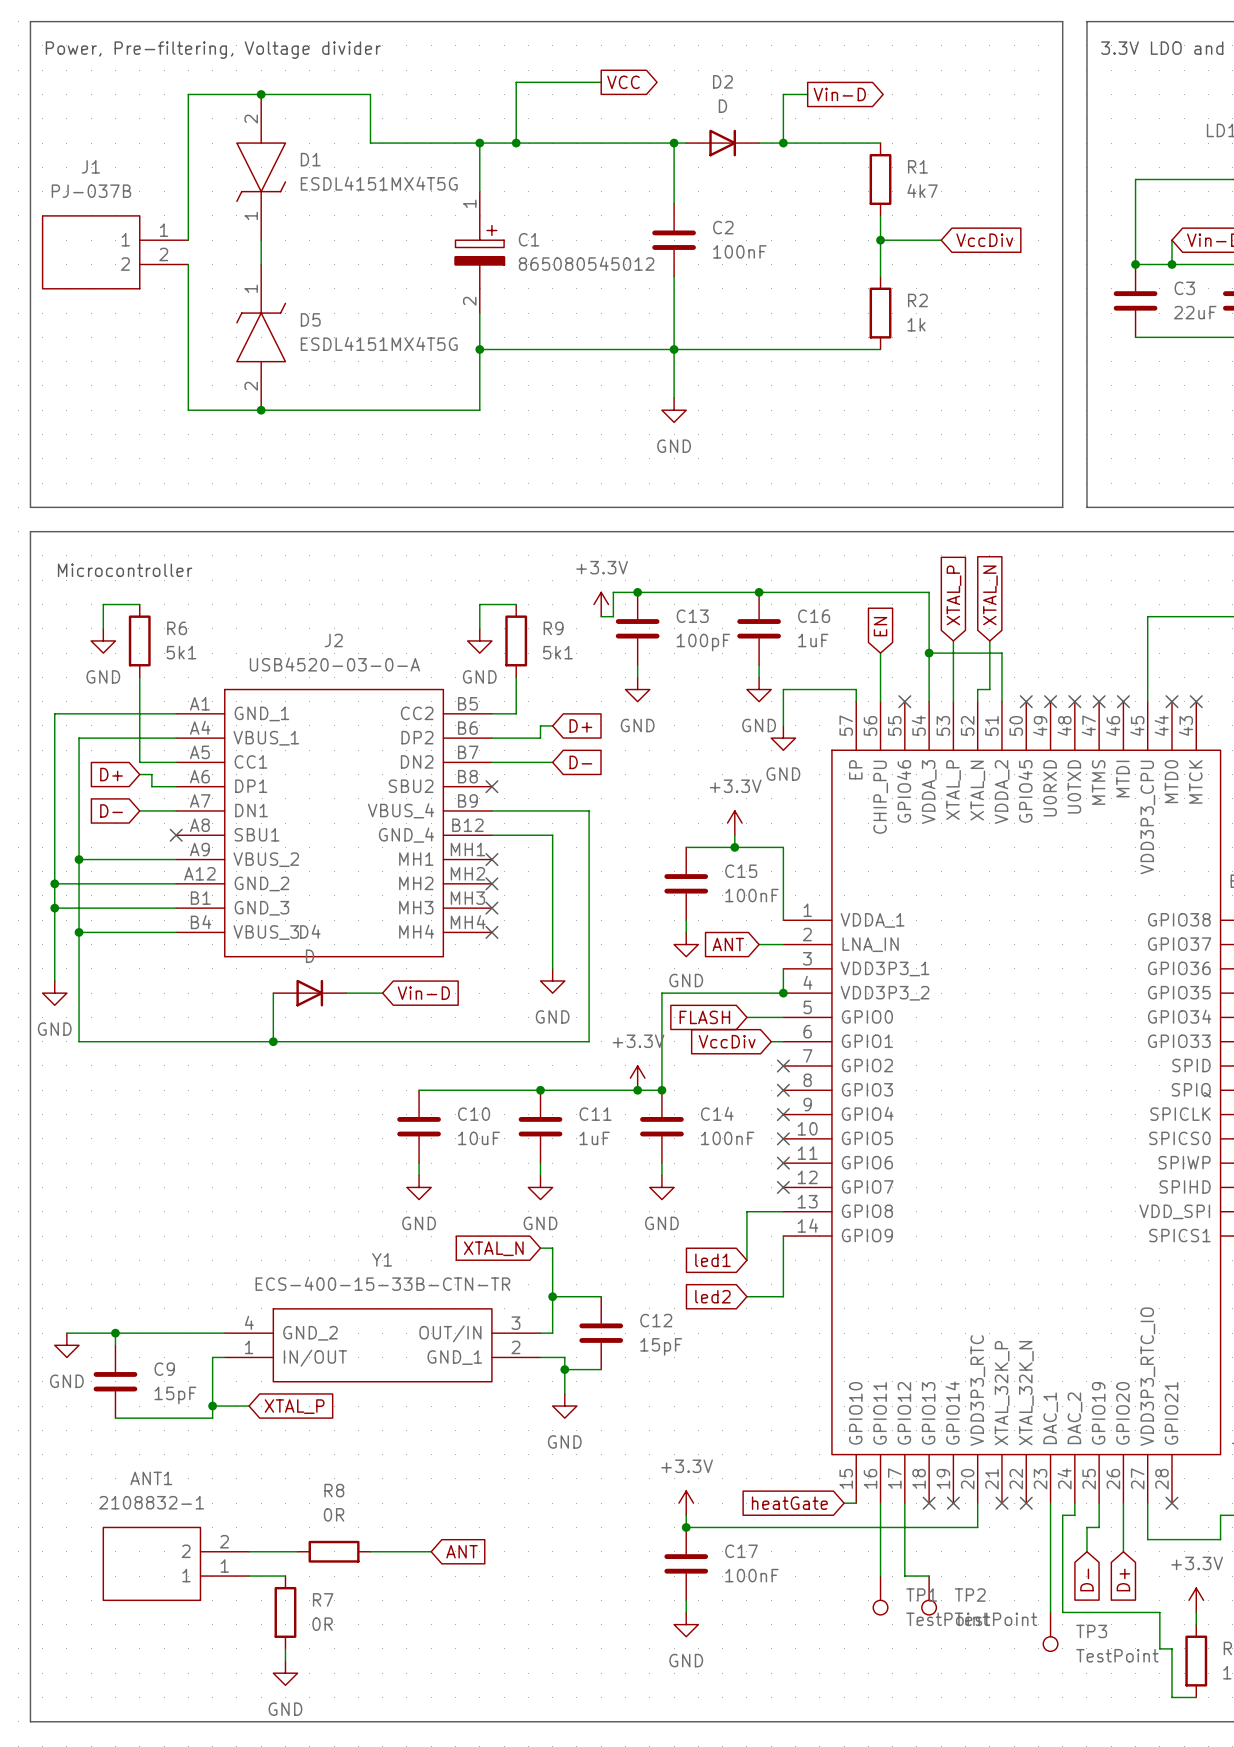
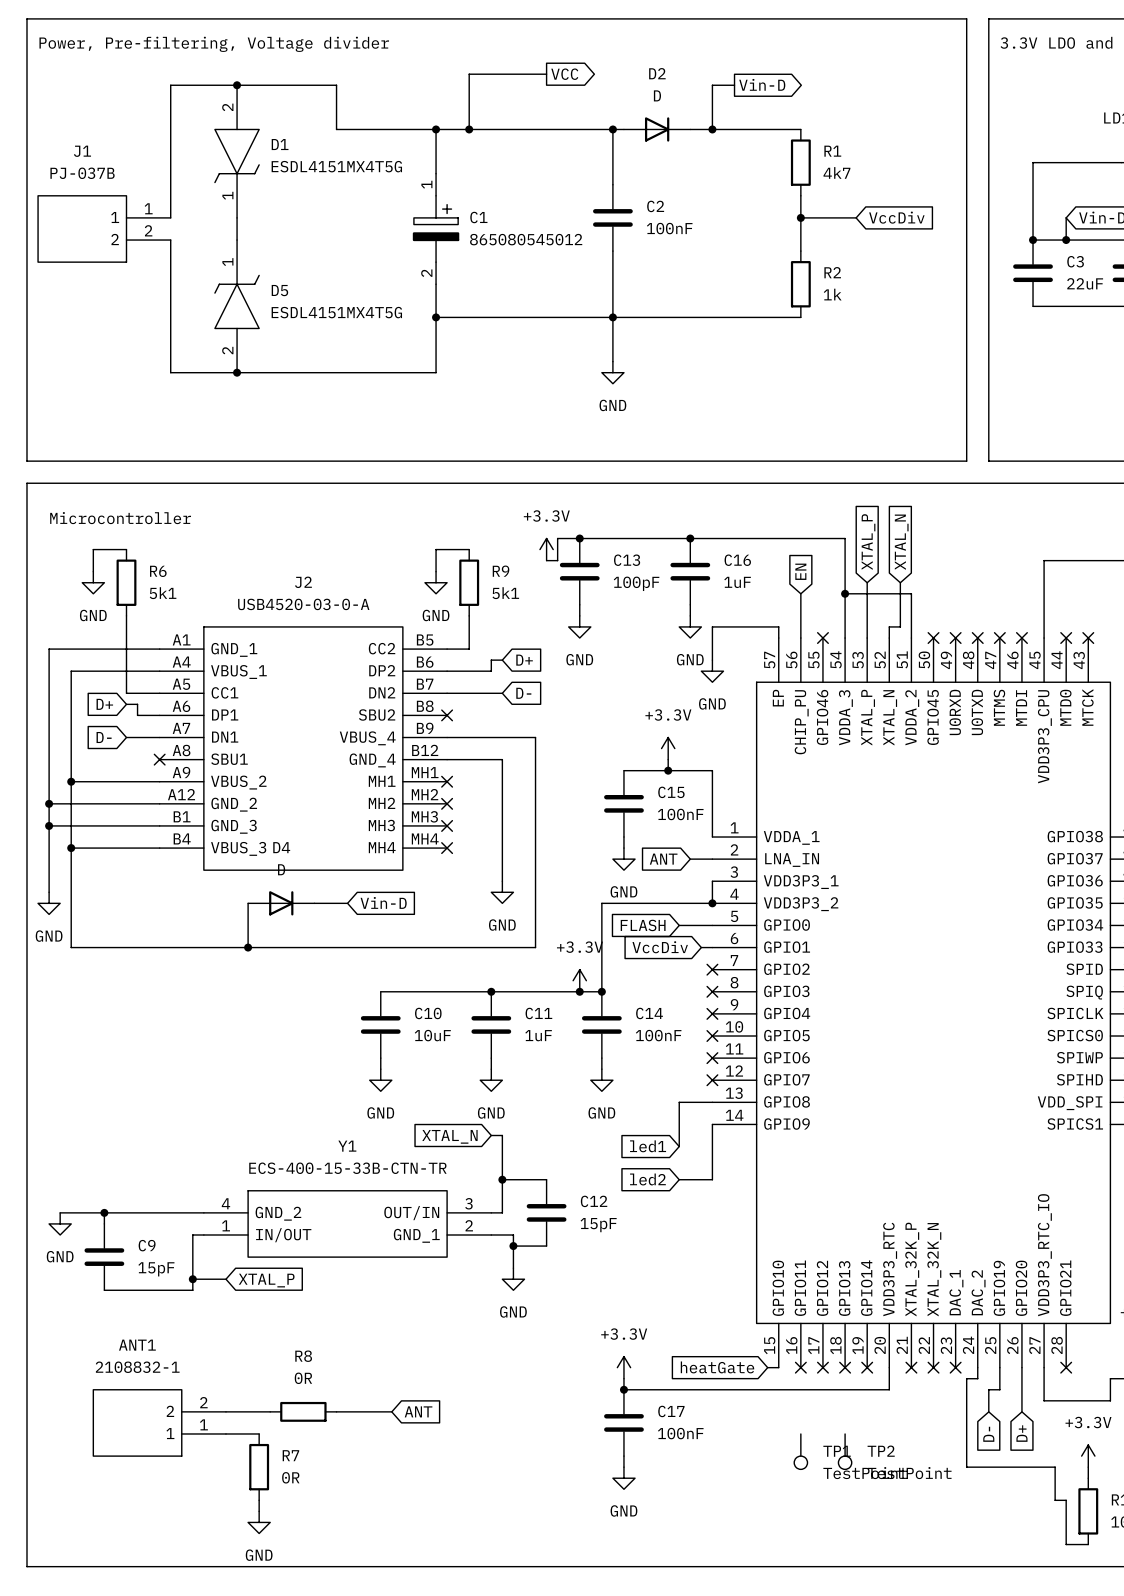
wire: (880, 1503) (880, 1576) -> none
no-connect mark: none -> (800, 1367)
wire: (904, 1503) (904, 1576) (929, 1576) -> none
no-connect mark: none -> (822, 1367)
wire: (1050, 1503) (1050, 1612) -> none
no-connect mark: none -> (955, 1367)
TP3: TestPoint (1050, 1631) -> none

